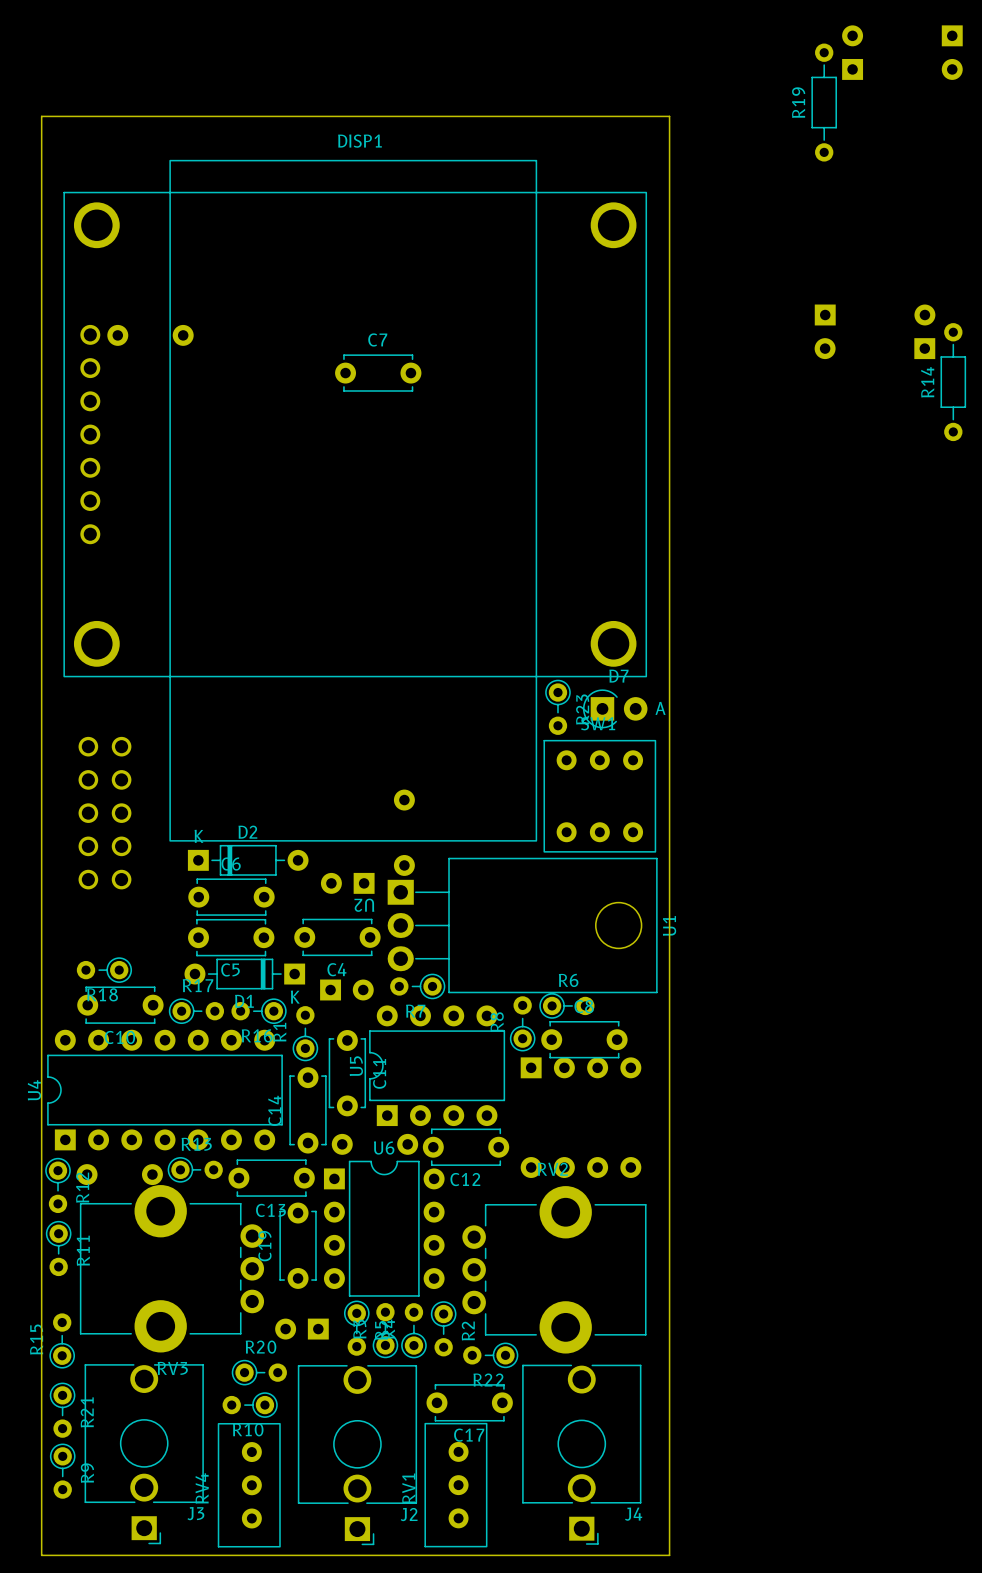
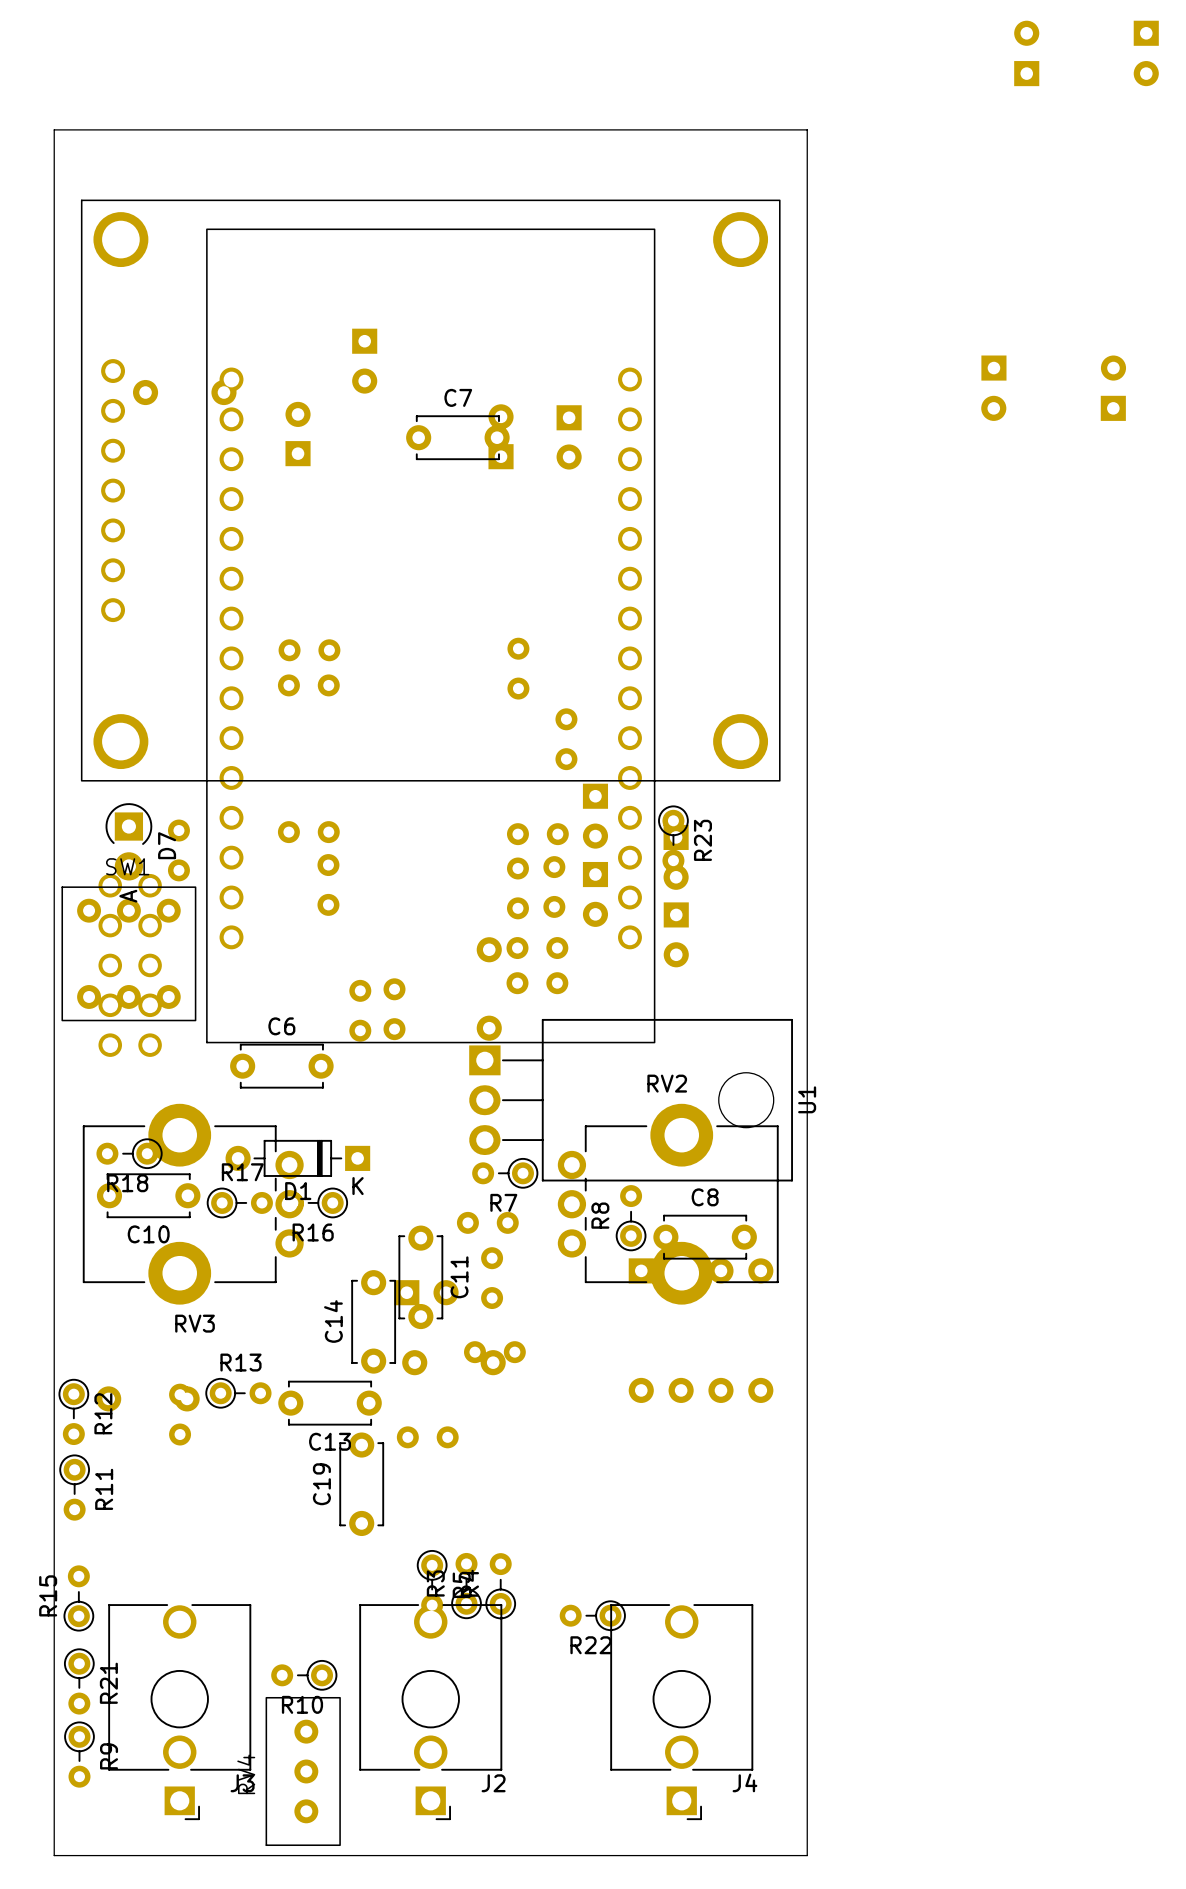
R19: (824, 102) -> none
part: none -> (364, 361)
part: none -> (298, 434)
part: none -> (501, 436)
part: none -> (569, 437)
R14: (953, 382) -> none
part: none -> (430, 490)
DISP1: (355, 434) -> none
U2: (353, 500) -> none
part: none -> (430, 635)
part: none -> (309, 650)
part: none -> (518, 668)
part: none -> (308, 685)
part: none -> (566, 739)
part: none -> (595, 816)
part: none -> (308, 832)
part: none -> (537, 834)
D7 rotation: 0° (615, 708) -> 90° clockwise (128, 841)
D7 position: (615, 708) -> (128, 841)
part: none -> (178, 850)
part: none -> (676, 857)
part: none -> (328, 884)
part: none -> (554, 887)
part: none -> (517, 888)
part: none -> (595, 894)
part: none -> (676, 934)
SW1 position: (599, 796) -> (128, 953)
part: none -> (537, 948)
part: none -> (537, 983)
part: none -> (394, 1009)
part: none -> (360, 1010)
D2: (248, 860) -> none
part: (347, 883) -> none
C5: (231, 937) -> none
C4: (337, 937) -> none
part position: (346, 990) -> (426, 1292)
R6 side: top (566, 1005) -> bottom (487, 1222)
R1 side: top (305, 1033) -> bottom (494, 1352)
U5: (437, 1065) -> none
part: none -> (492, 1278)
U4: (165, 1090) -> none
C12: (466, 1147) -> none
part: none -> (180, 1414)
U6: (384, 1228) -> none
RV3 position: (171, 1268) -> (193, 1204)
RV2 position: (554, 1269) -> (668, 1204)
R2 side: top (443, 1328) -> bottom (427, 1437)
part: (301, 1329) -> none
R20: (259, 1372) -> none
C17: (469, 1402) -> none
J3 position: (144, 1454) -> (179, 1712)
J4 position: (581, 1454) -> (681, 1712)
J2 position: (357, 1455) -> (430, 1712)
RV1: (455, 1485) -> none

